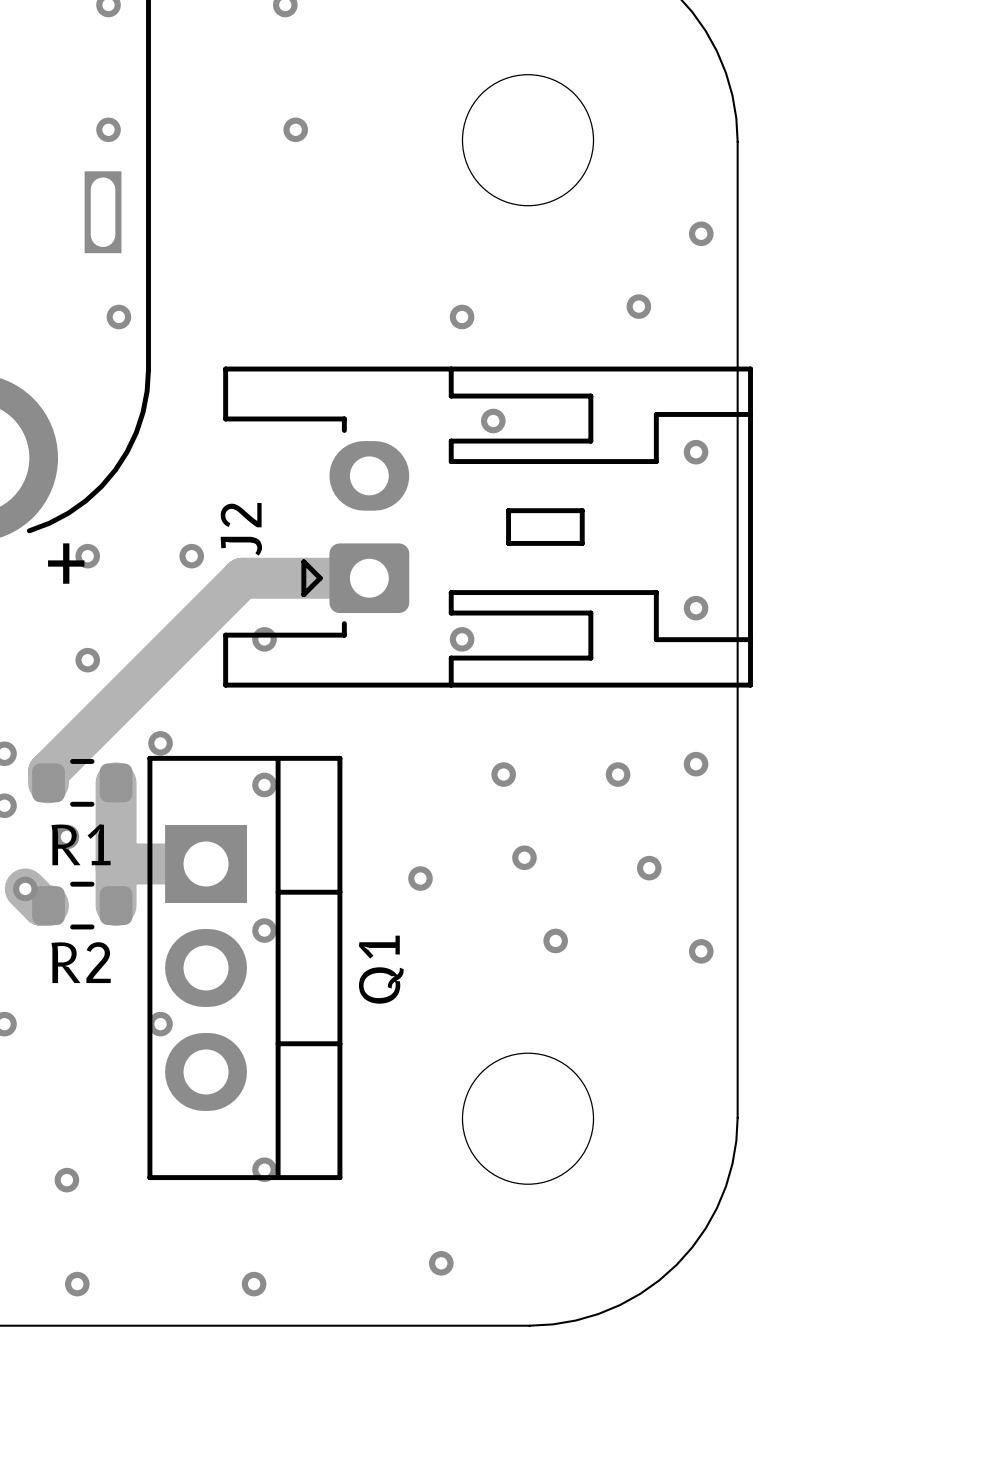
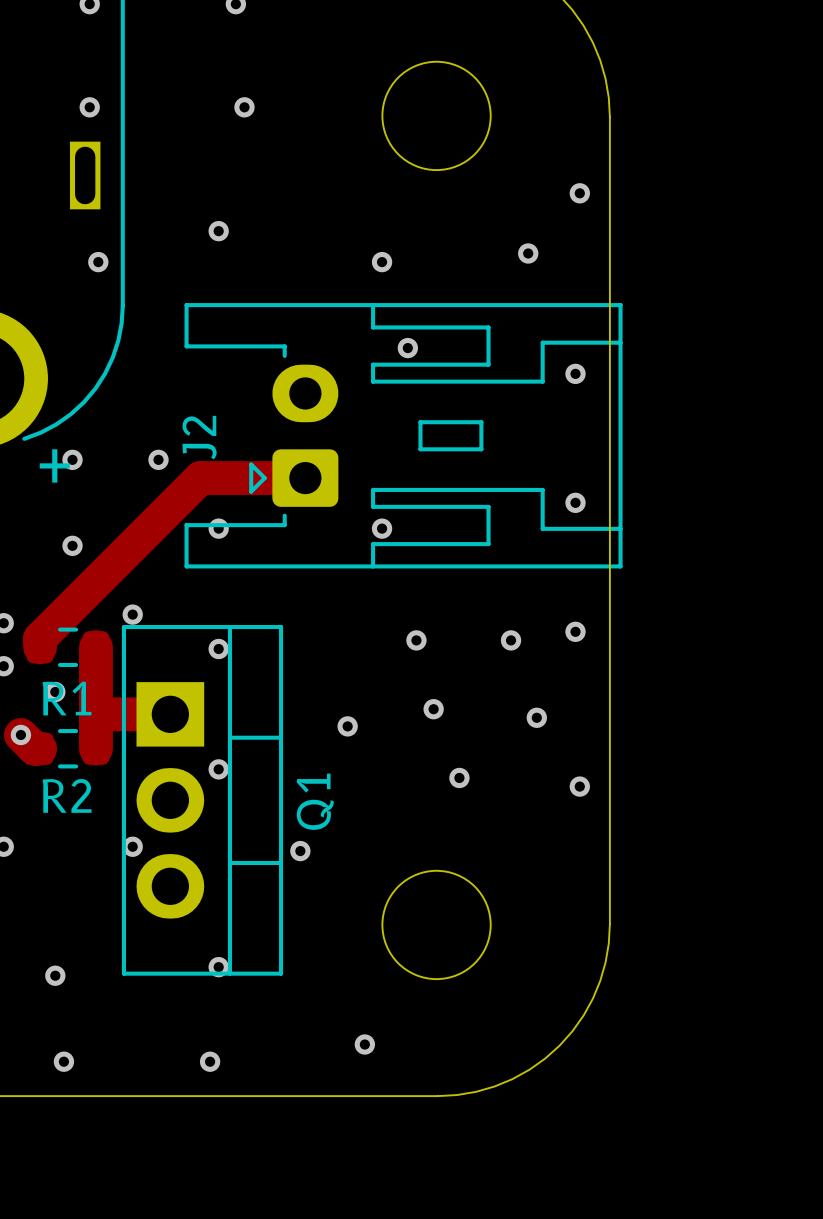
via: none -> (218, 231)
via: none -> (300, 851)

